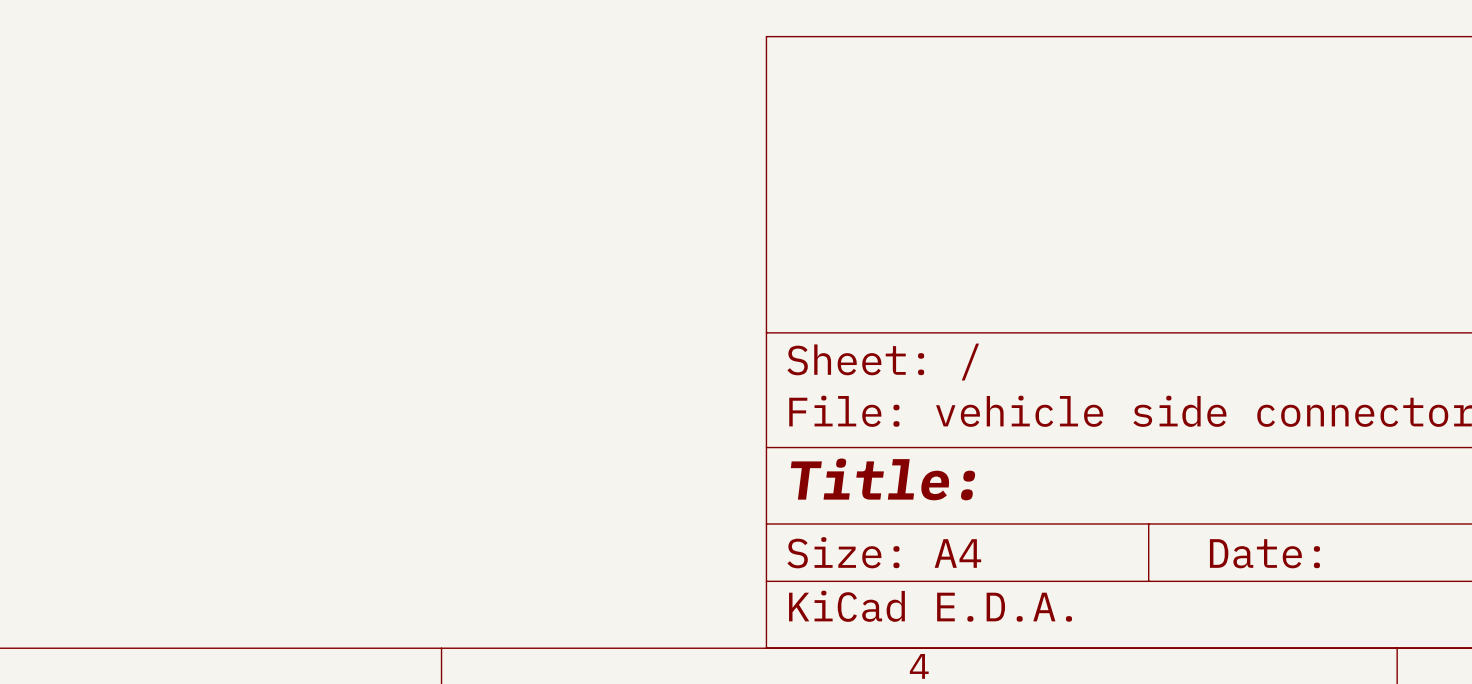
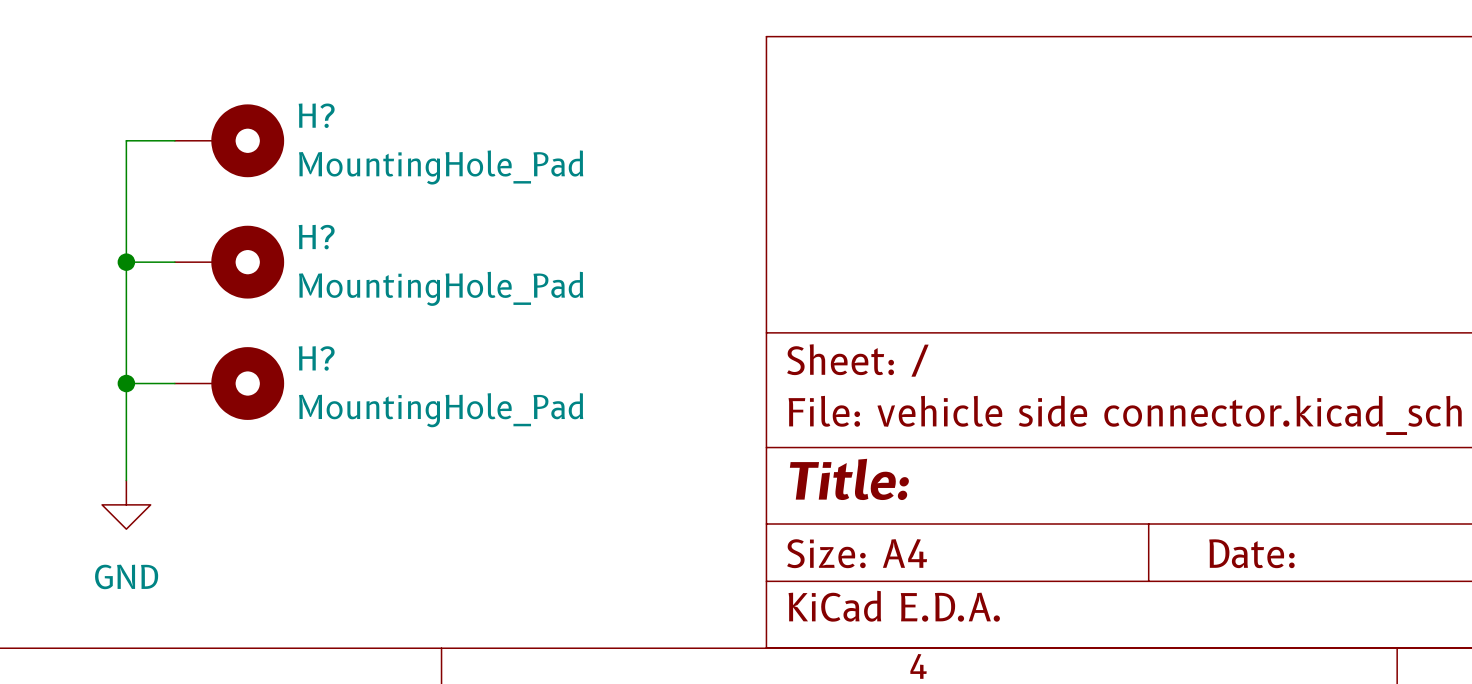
wire: none -> (174, 140) (126, 140) (126, 480)
H?: none -> MountingHole_Pad (229, 140)
wire: none -> (126, 262) (174, 262)
junction: none -> (126, 262)
H?: none -> MountingHole_Pad (229, 262)
wire: none -> (126, 383) (174, 383)
junction: none -> (126, 383)
H?: none -> MountingHole_Pad (229, 383)
power symbol: none -> GND (126, 504)

